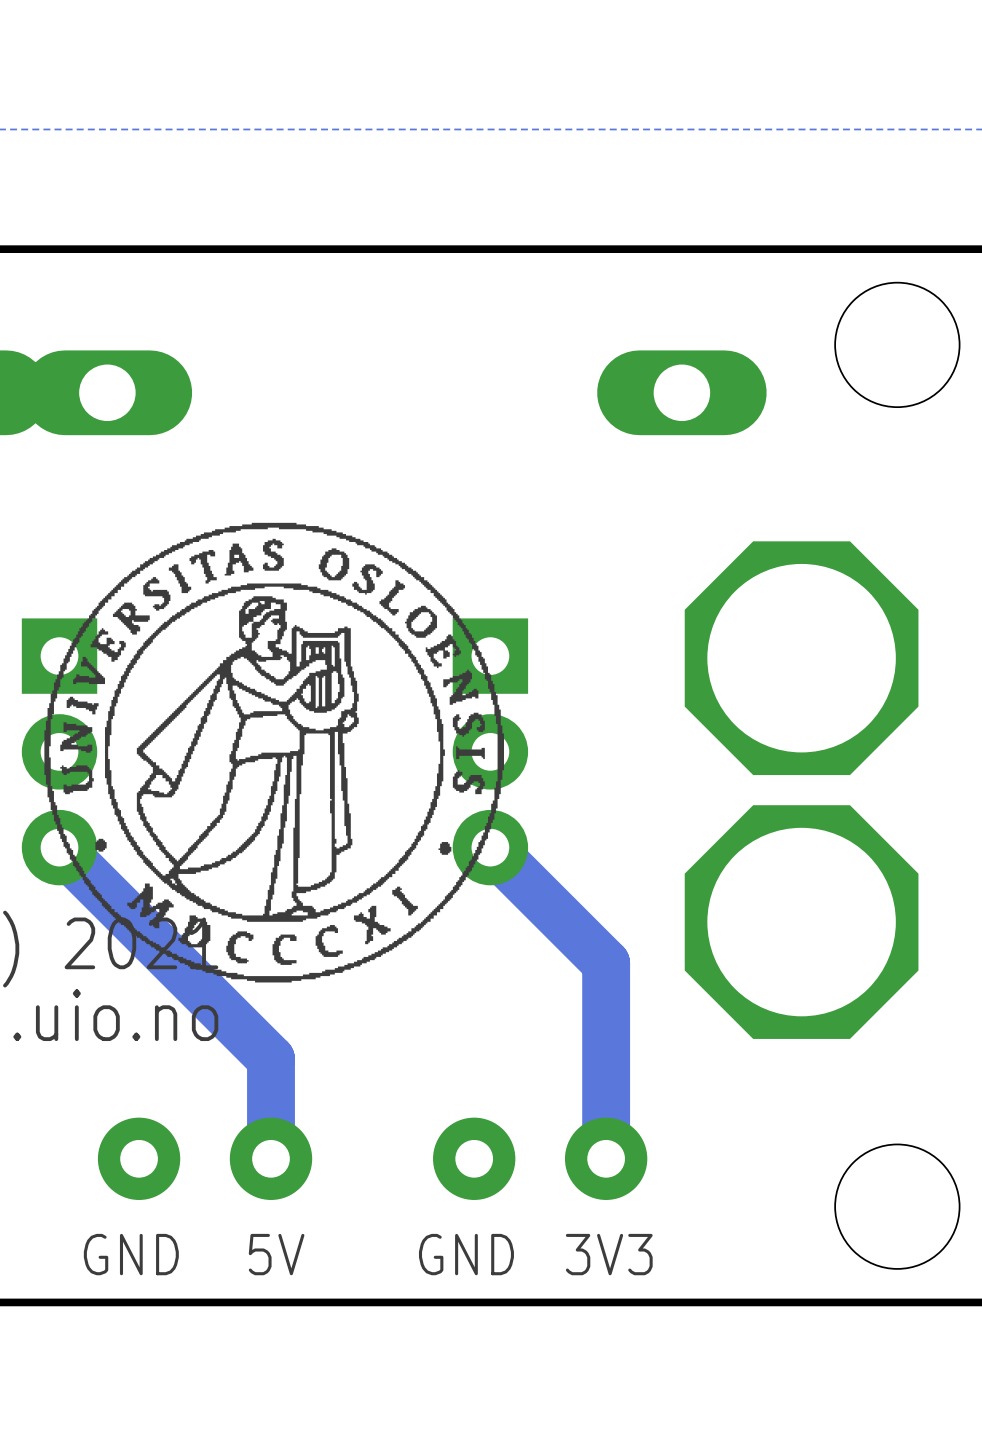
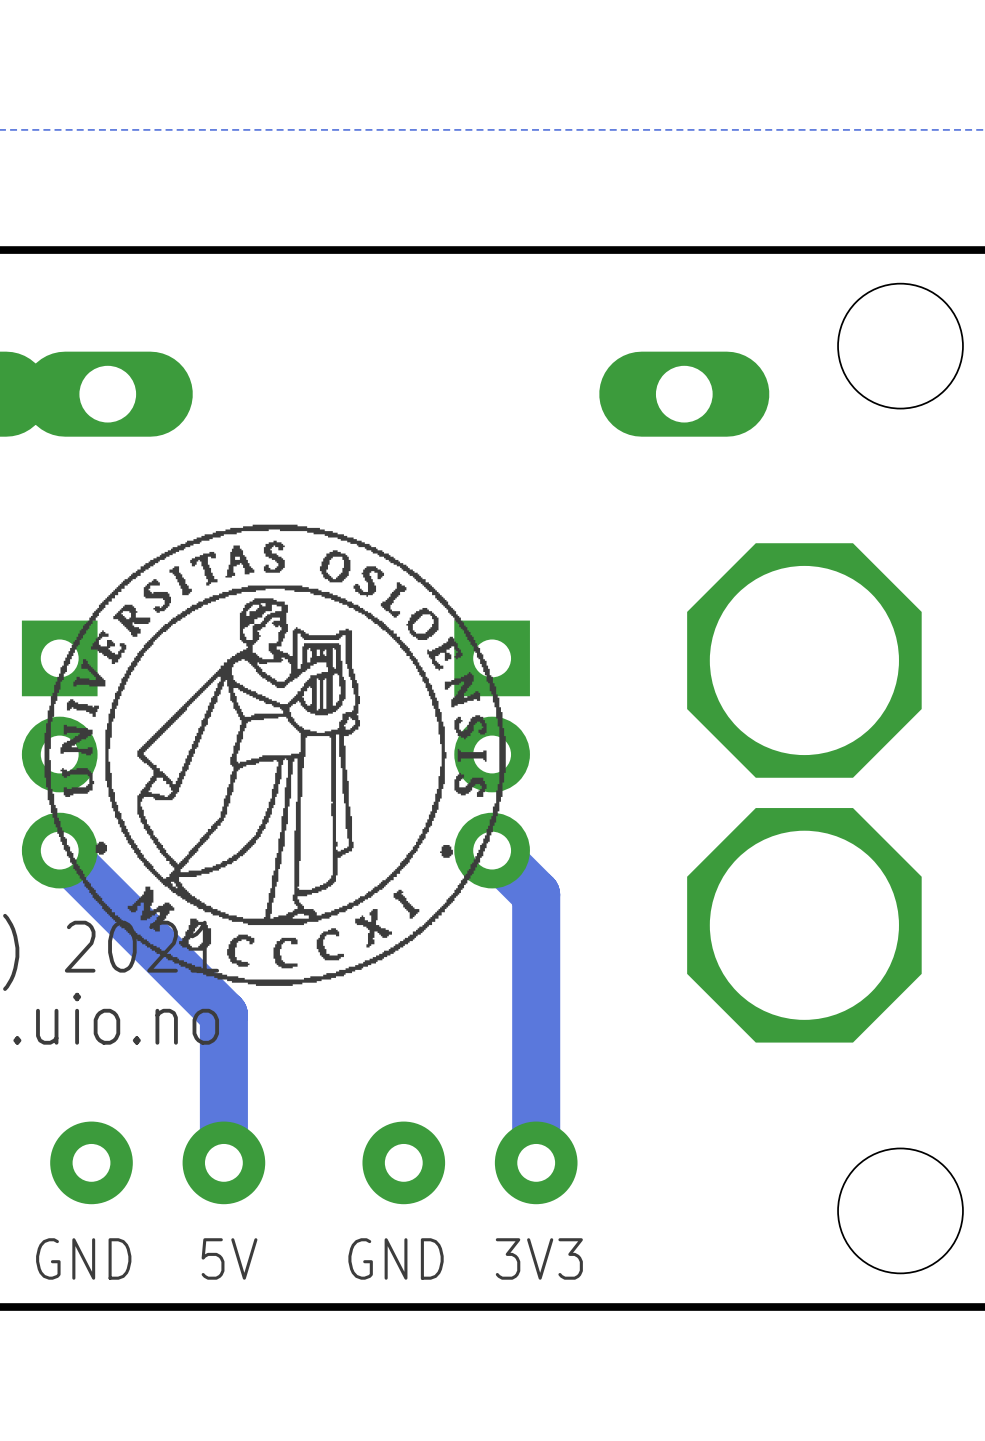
track: (534, 891) (606, 963) (606, 1158) -> (536, 894) (536, 1162)
track: (223, 1011) (271, 1059) (271, 1158) -> (223, 1014) (223, 1162)
part position: (205, 1158) -> (157, 1162)
part position: (540, 1158) -> (469, 1162)
text position: GND (131, 1254) -> GND (83, 1258)
text position: 5V (276, 1254) -> 5V (229, 1258)
text position: GND (466, 1254) -> GND (396, 1258)
text position: 3V3 (609, 1254) -> 3V3 (539, 1258)

